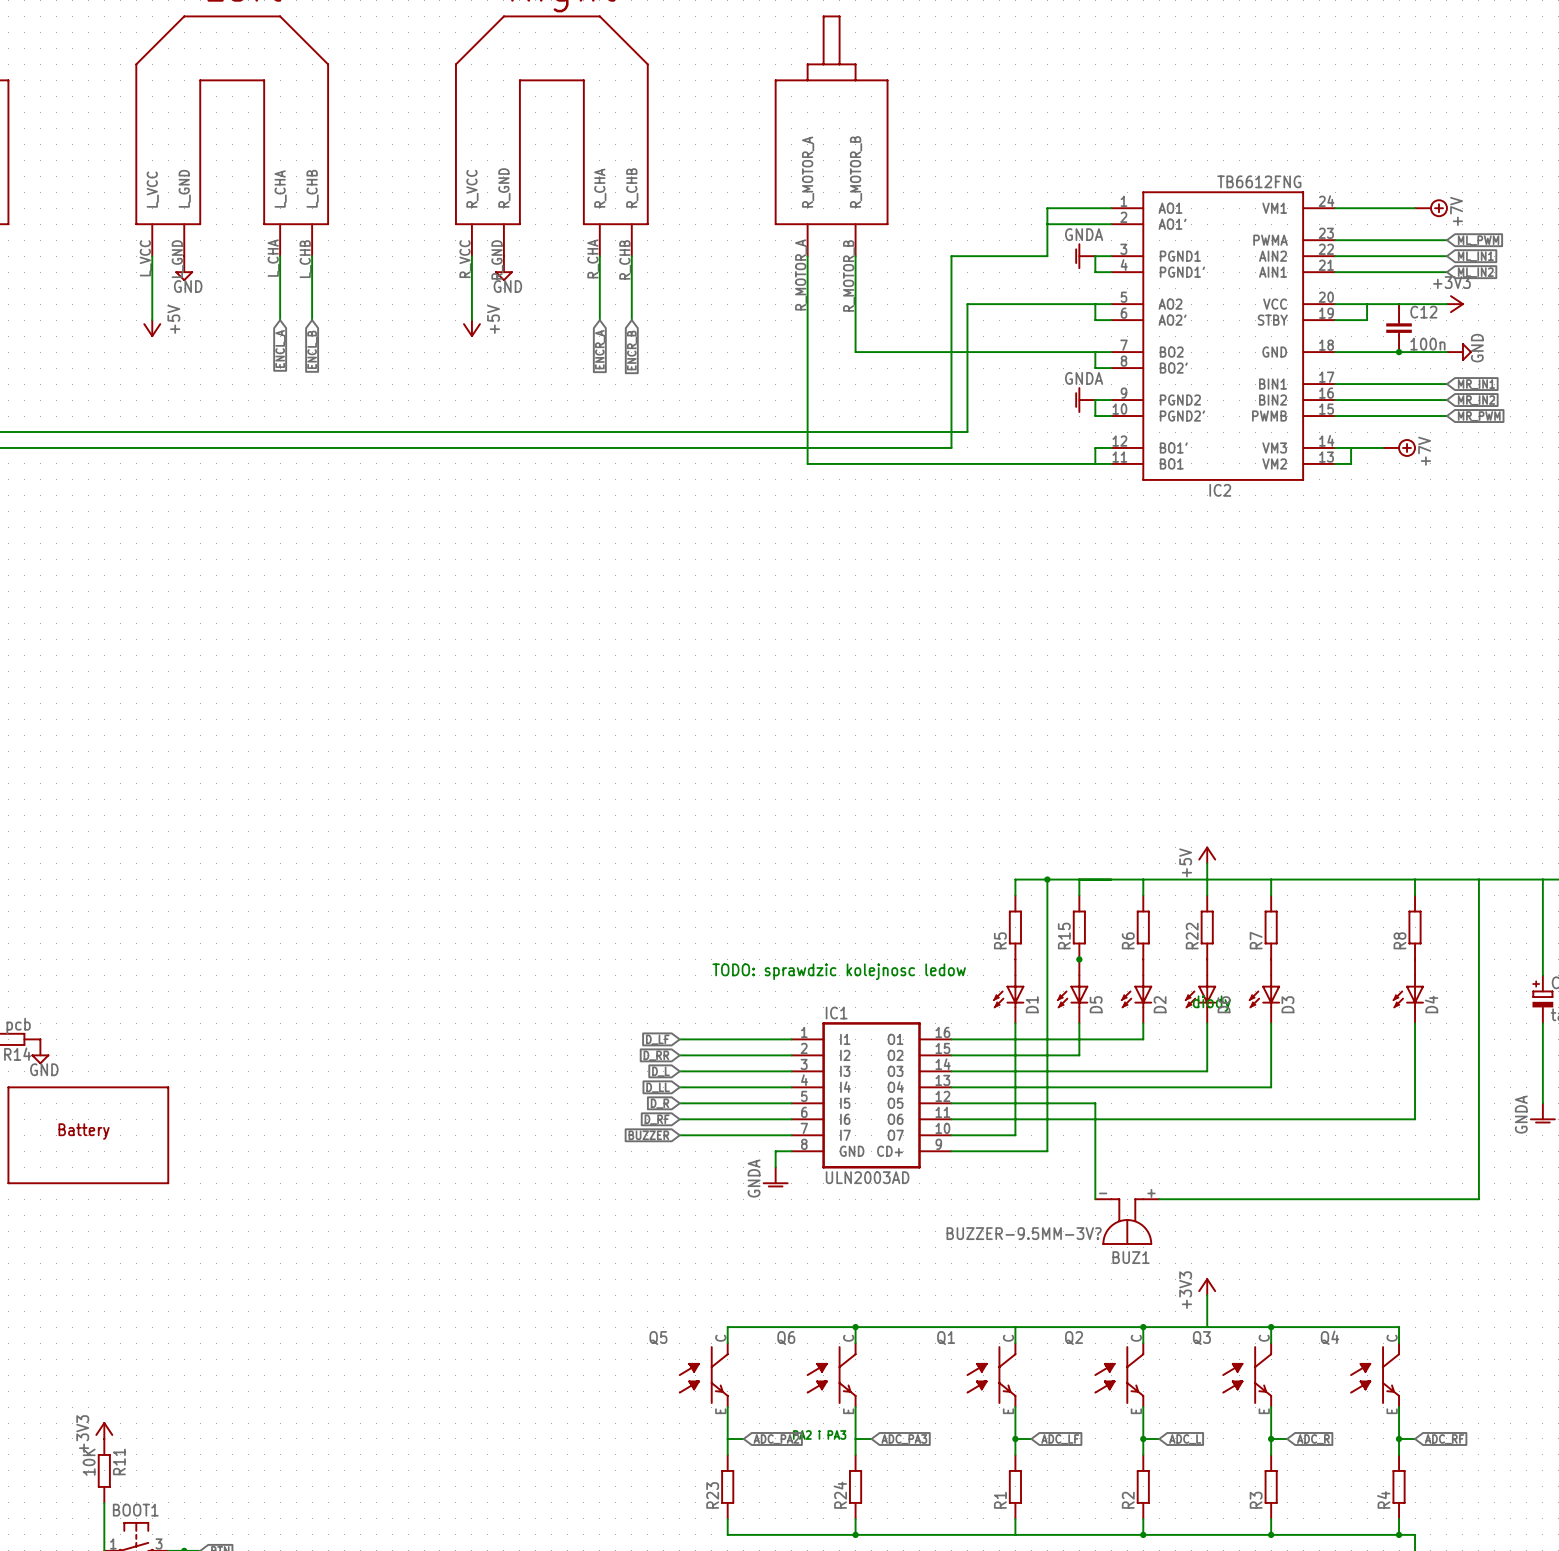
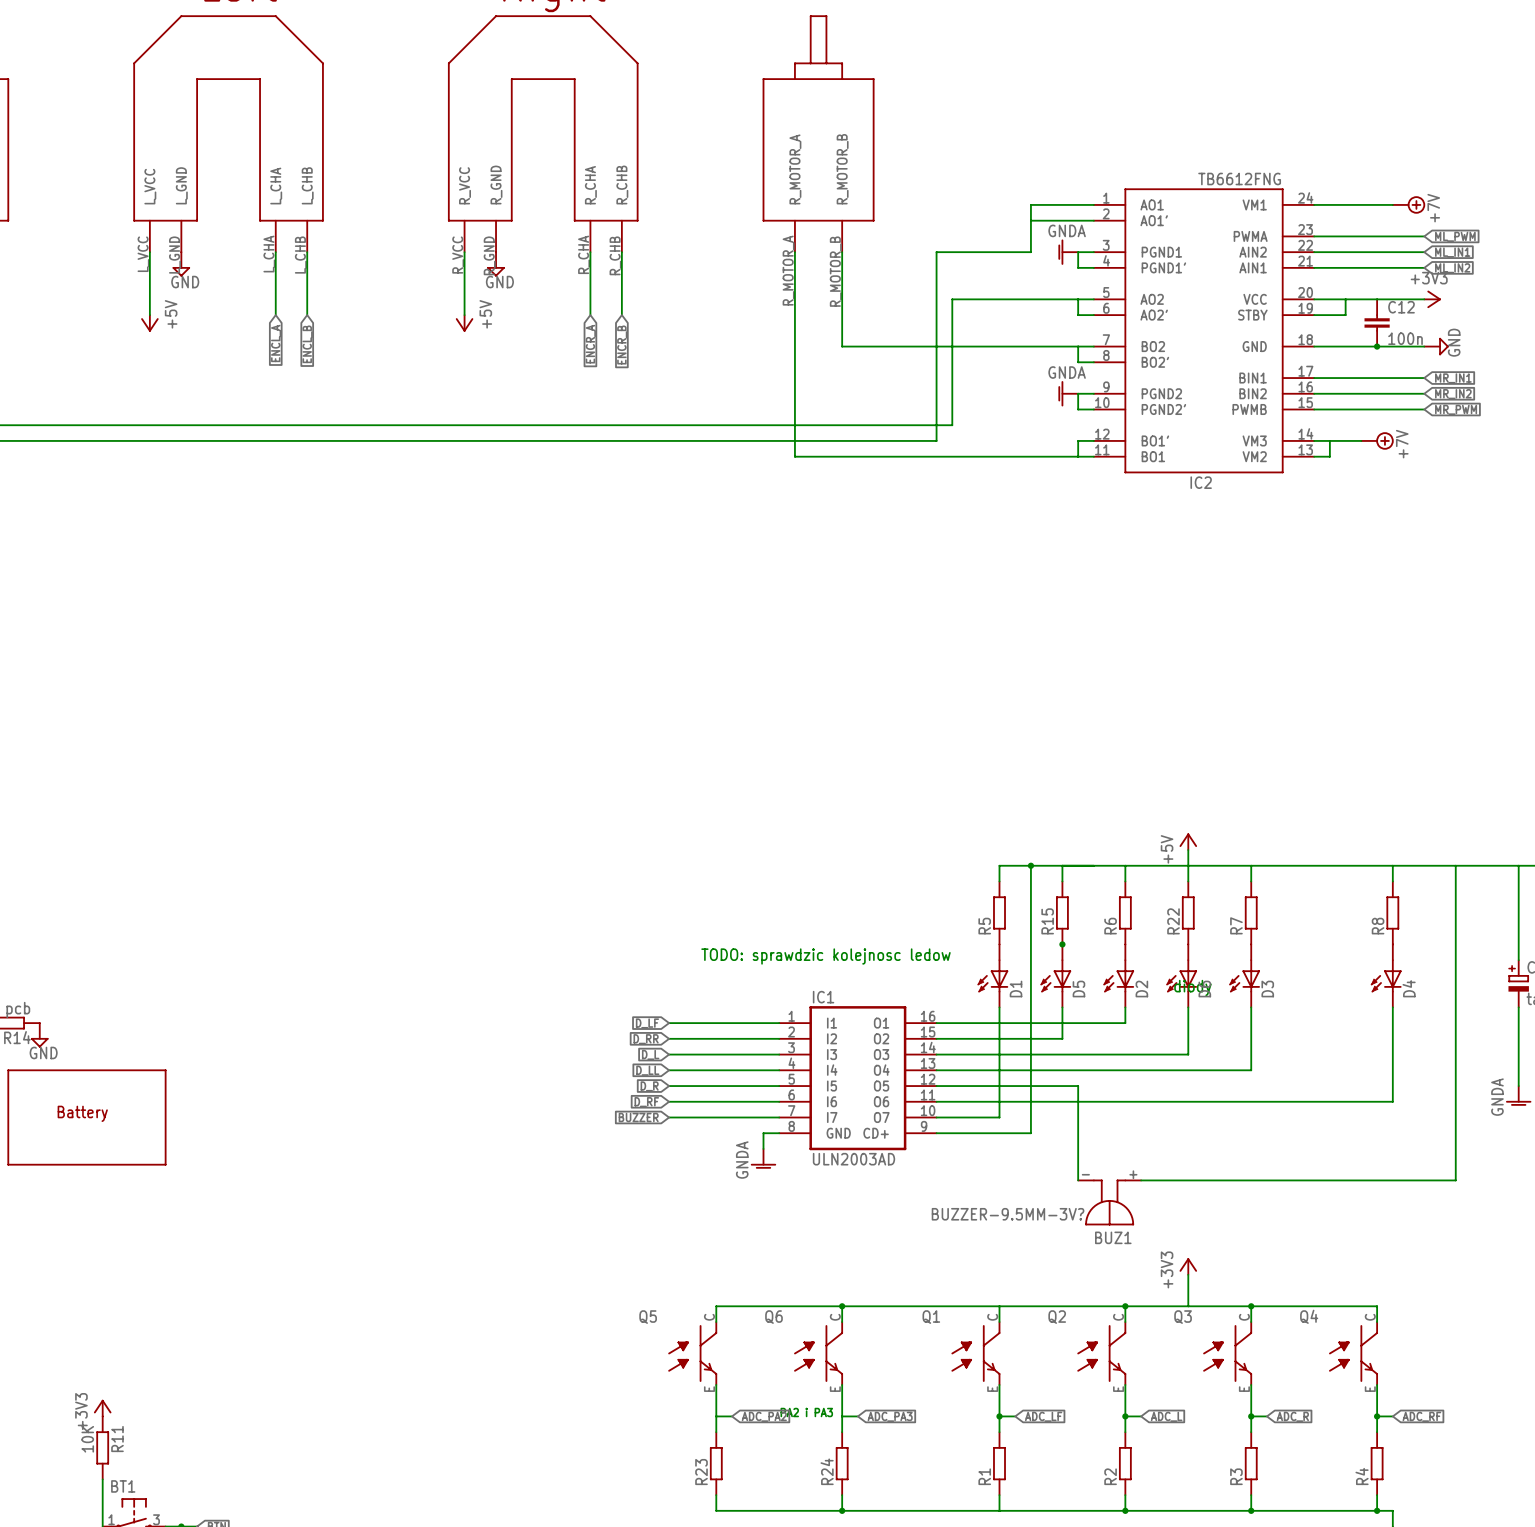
BOOT1 name: BOOT1 (135, 1510) -> BT1 (123, 1486)

